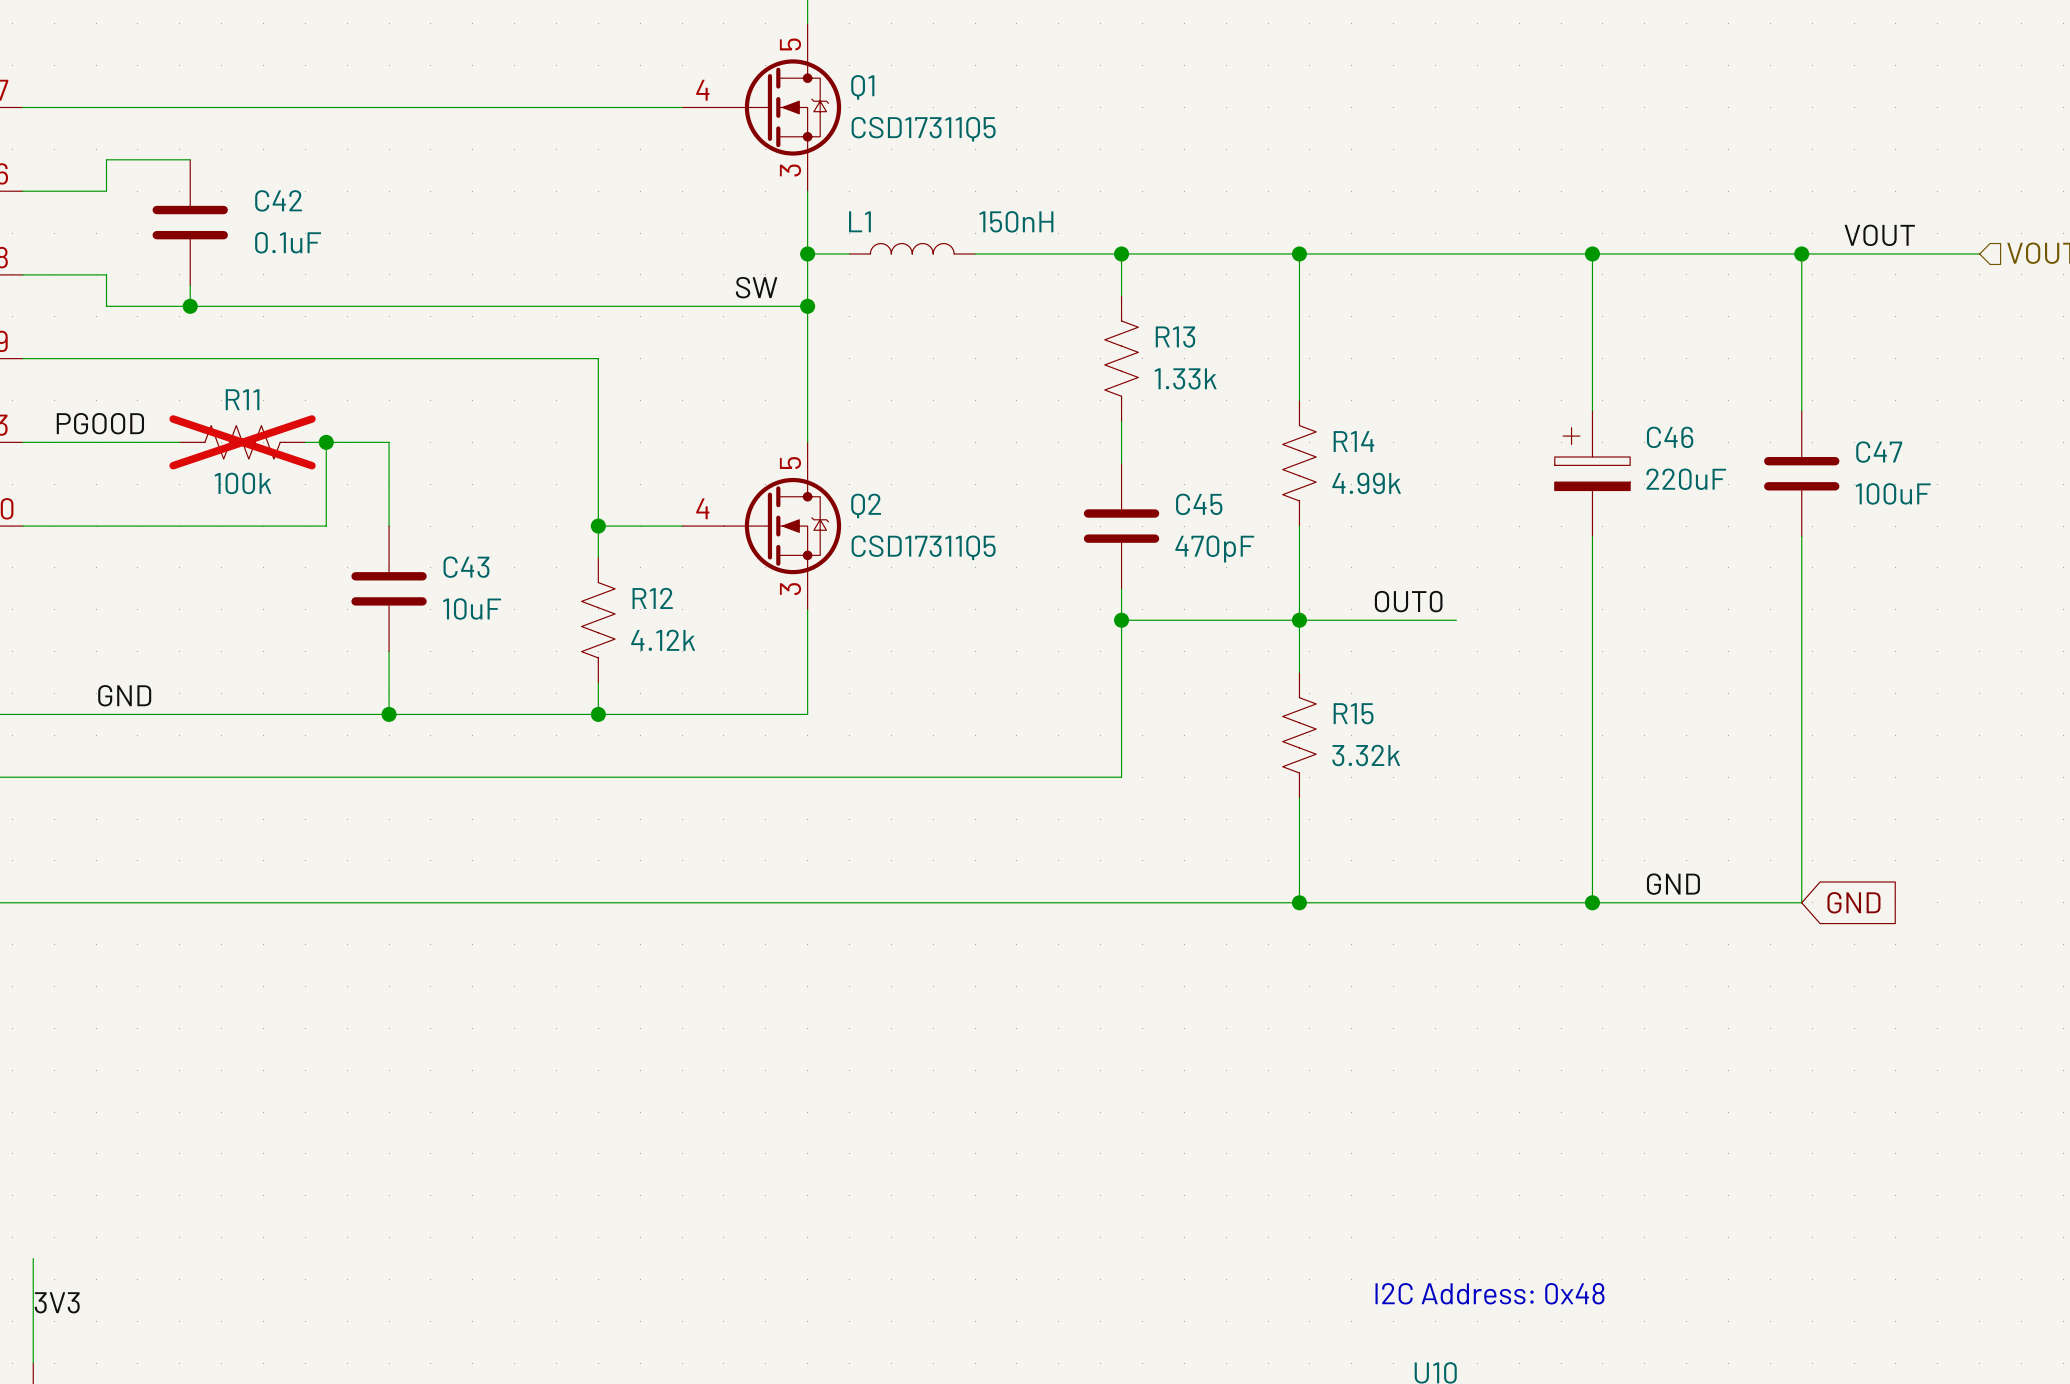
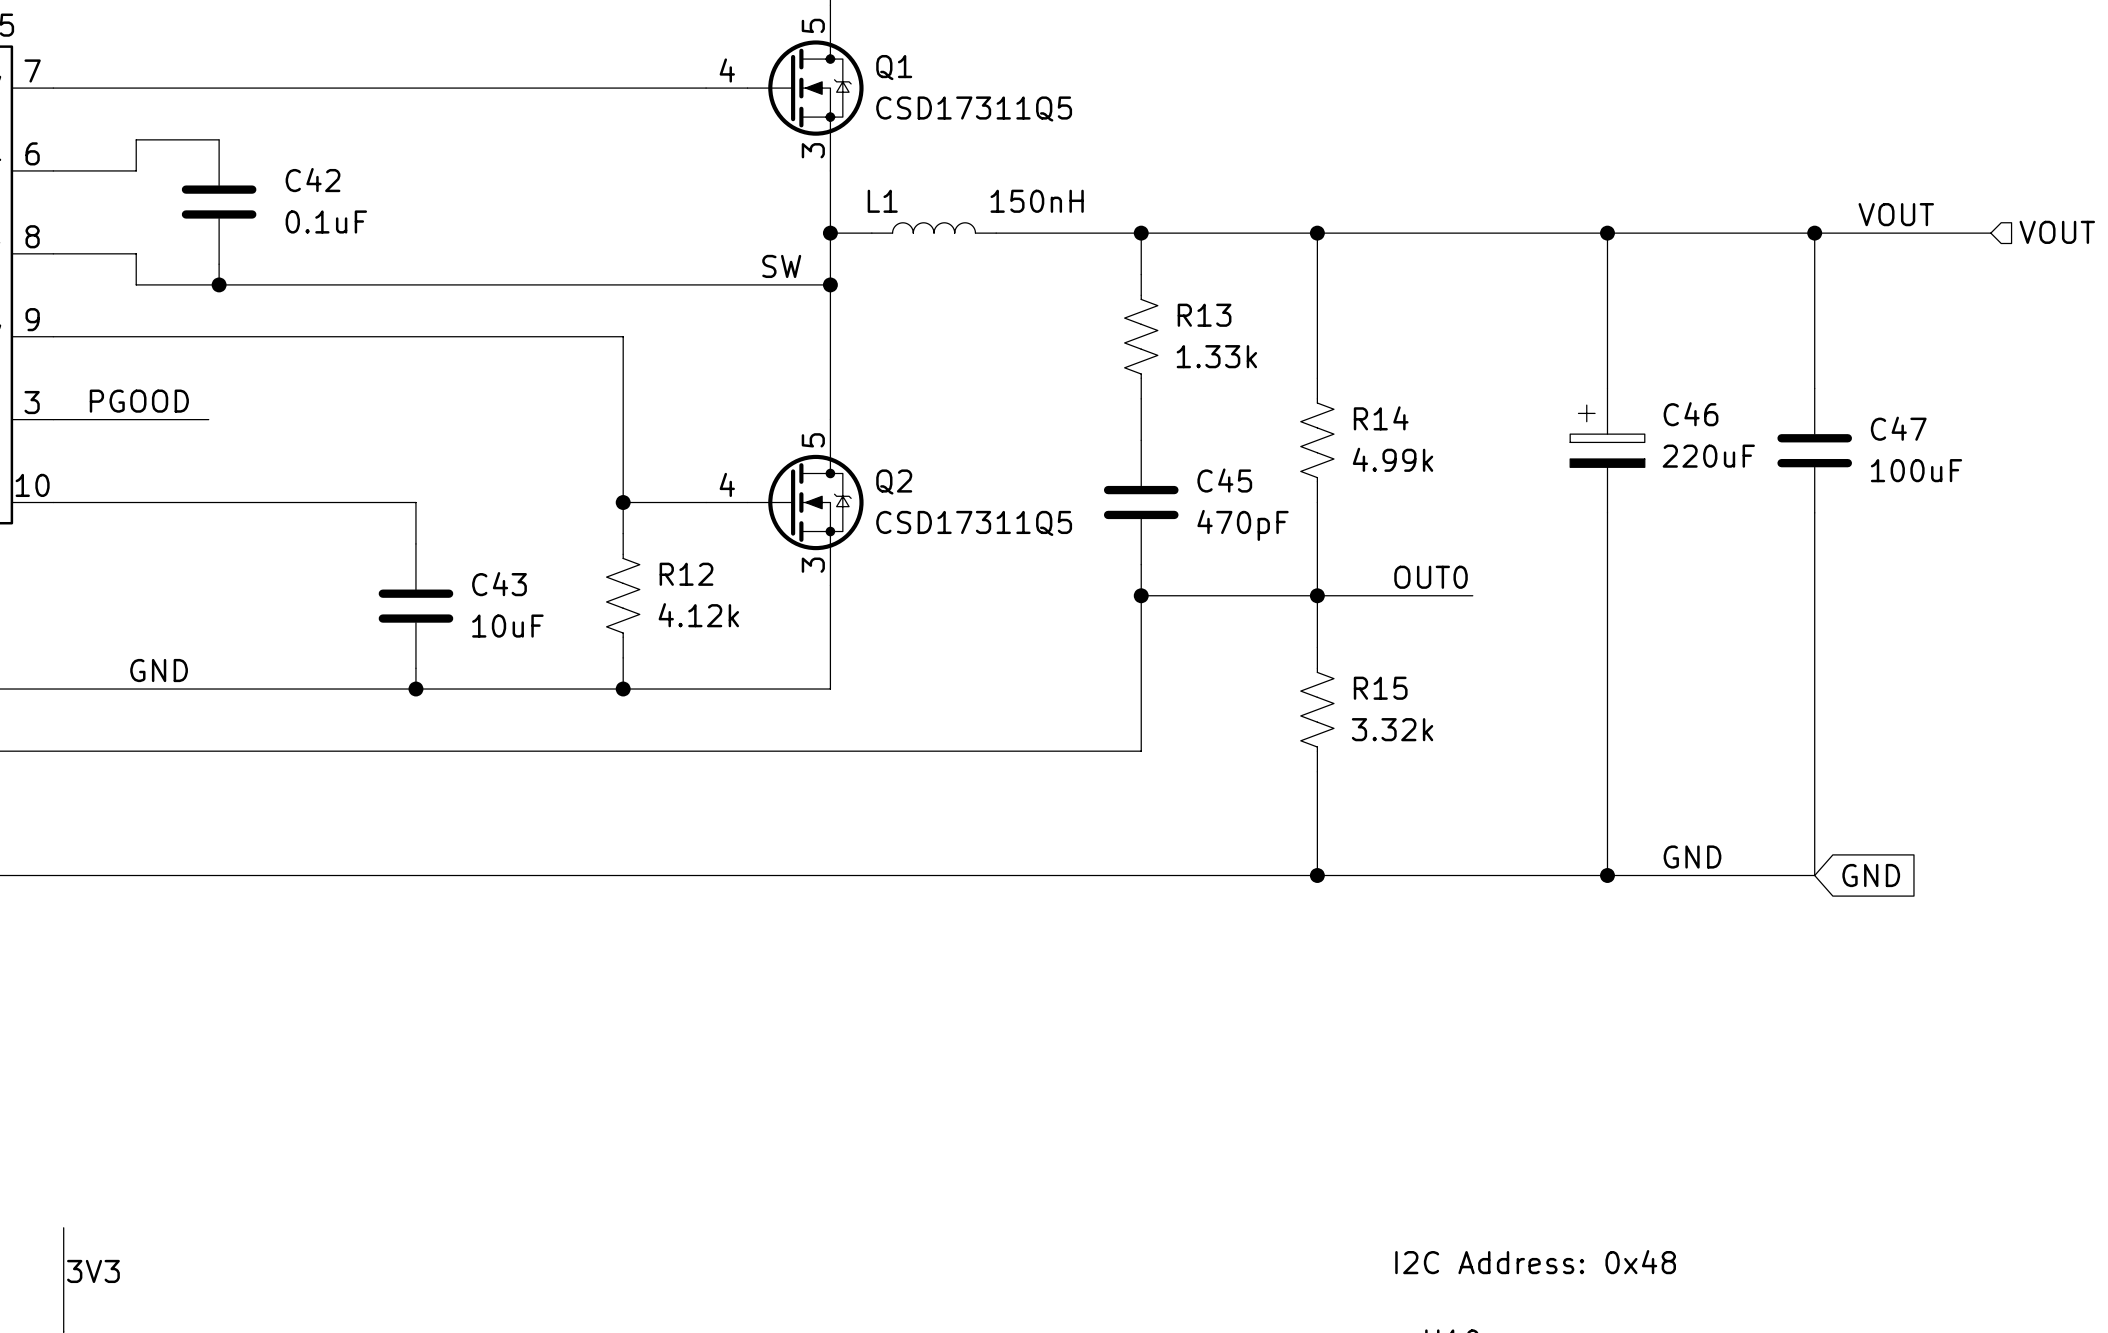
R11: 100k (242, 442) -> none
wire: (305, 442) (389, 442) (389, 526) -> none
wire: (326, 442) (326, 526) -> (415, 543) (415, 502) (353, 502)
junction: (326, 442) -> none
C43 position: (389, 588) -> (415, 606)

